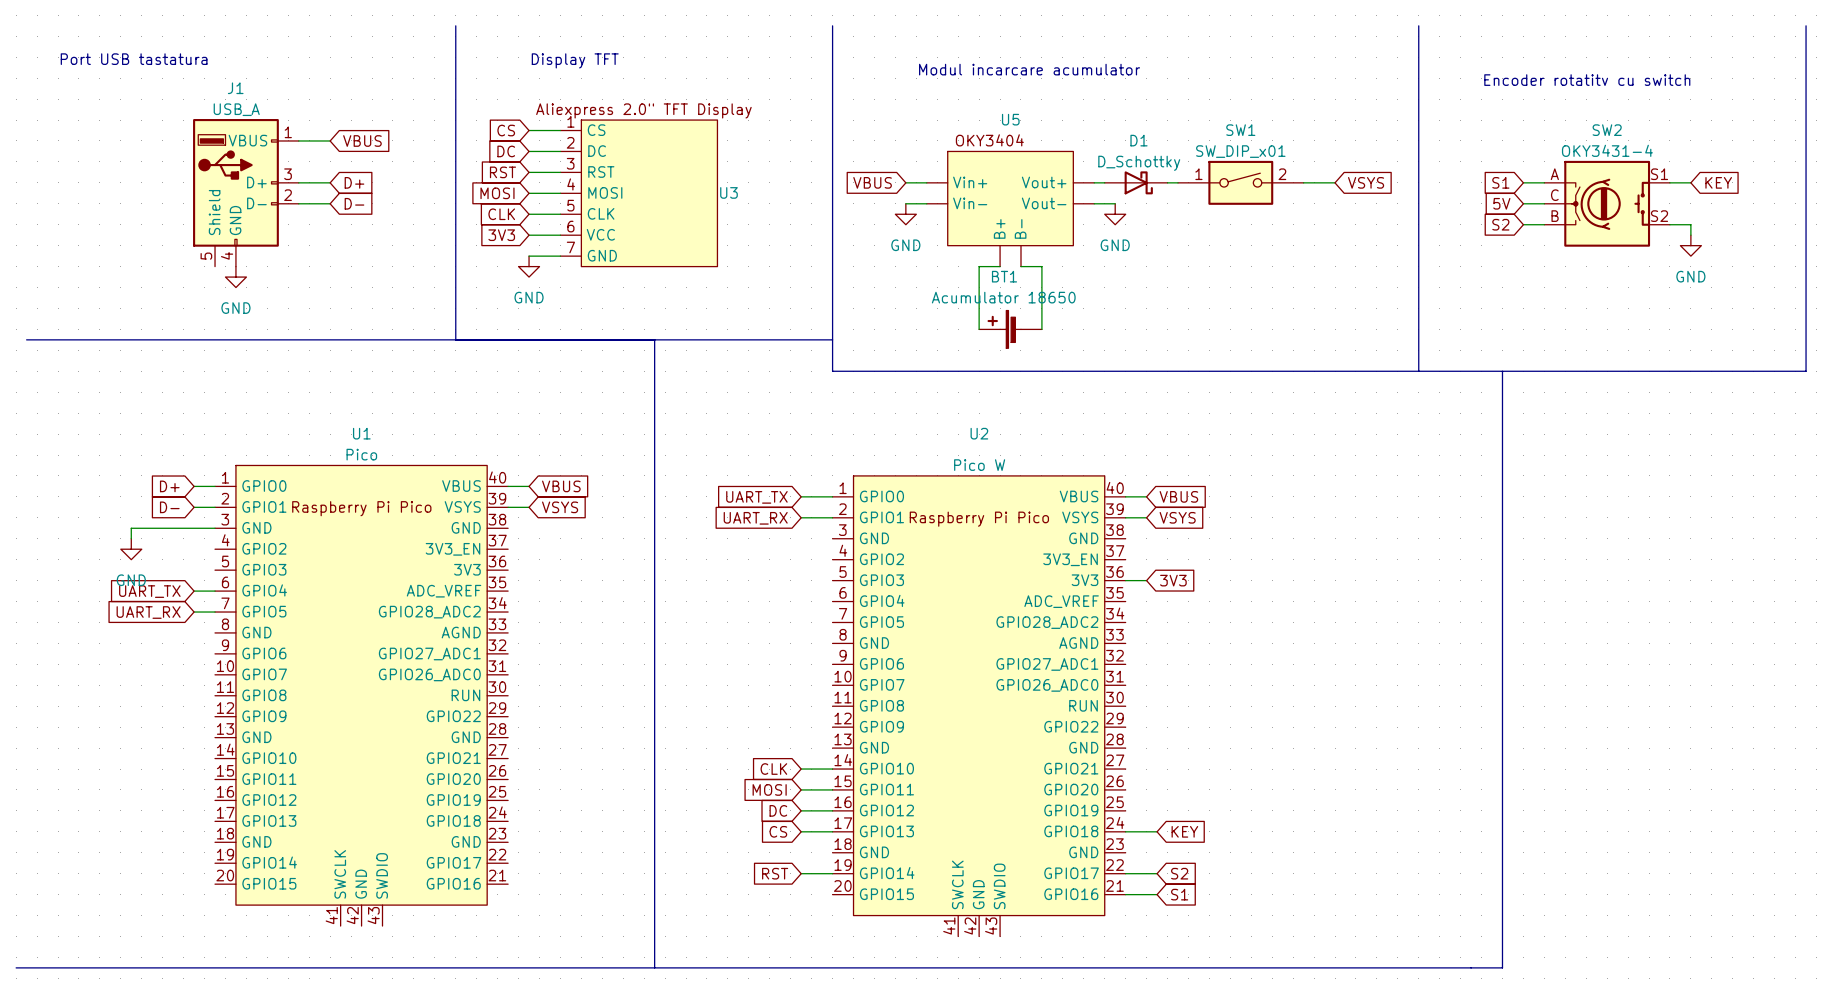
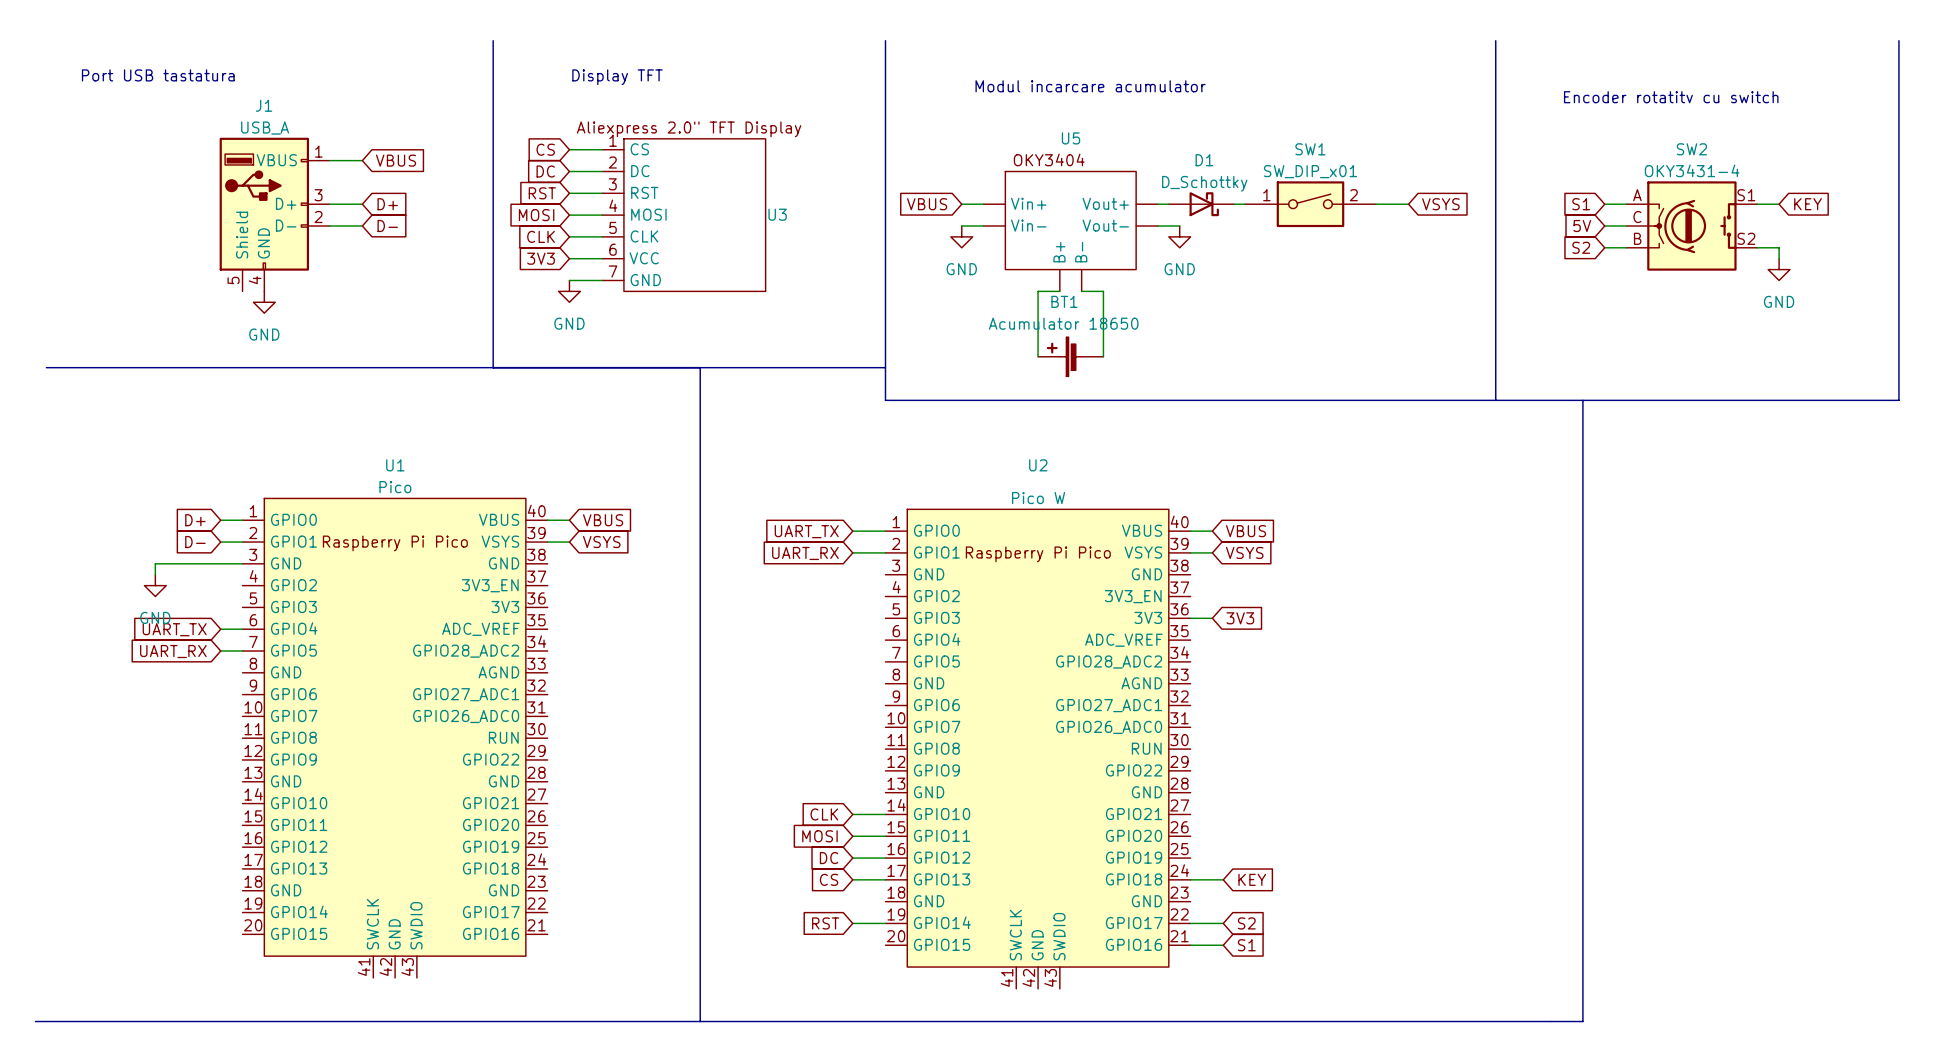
U3 symbol: [560, 120, 718, 267] -> [602, 138, 766, 292]
U5 symbol: [926, 151, 1095, 267] -> [983, 171, 1158, 292]

